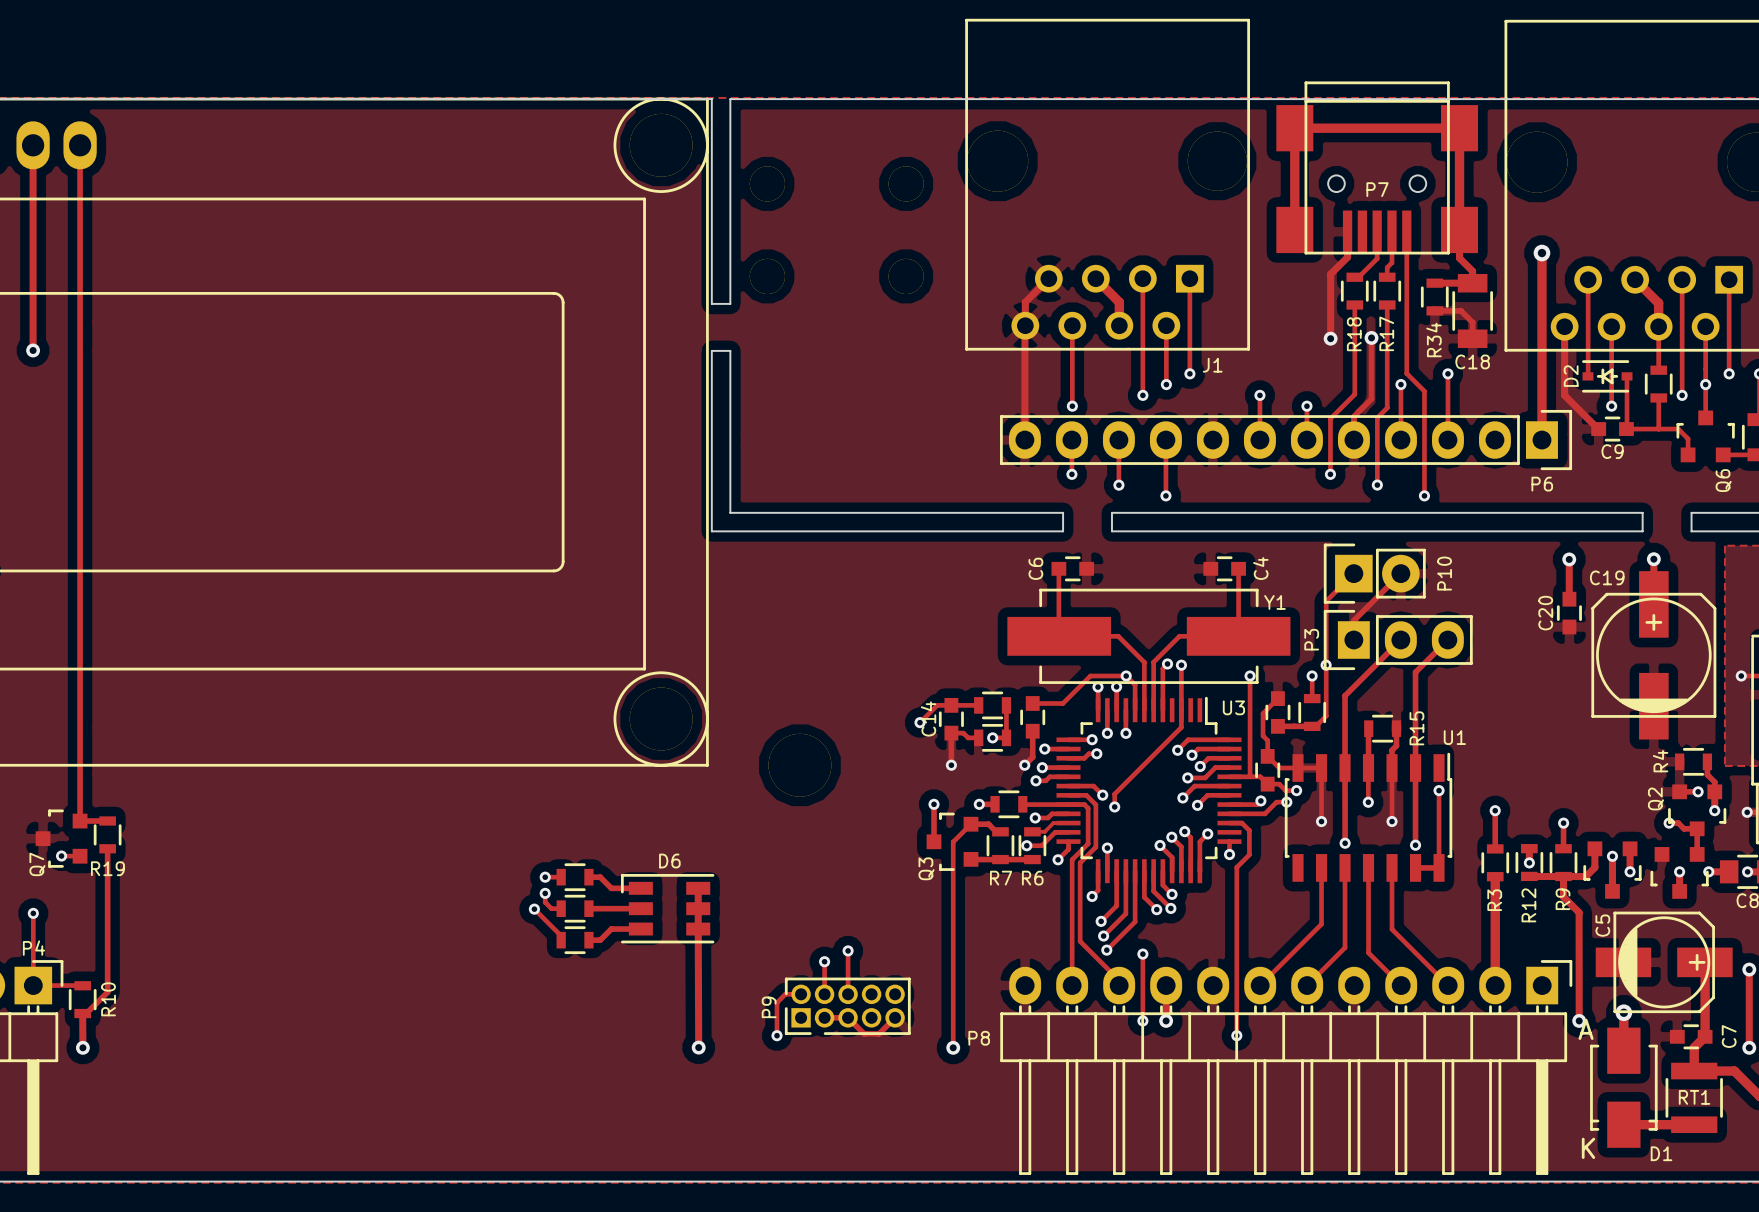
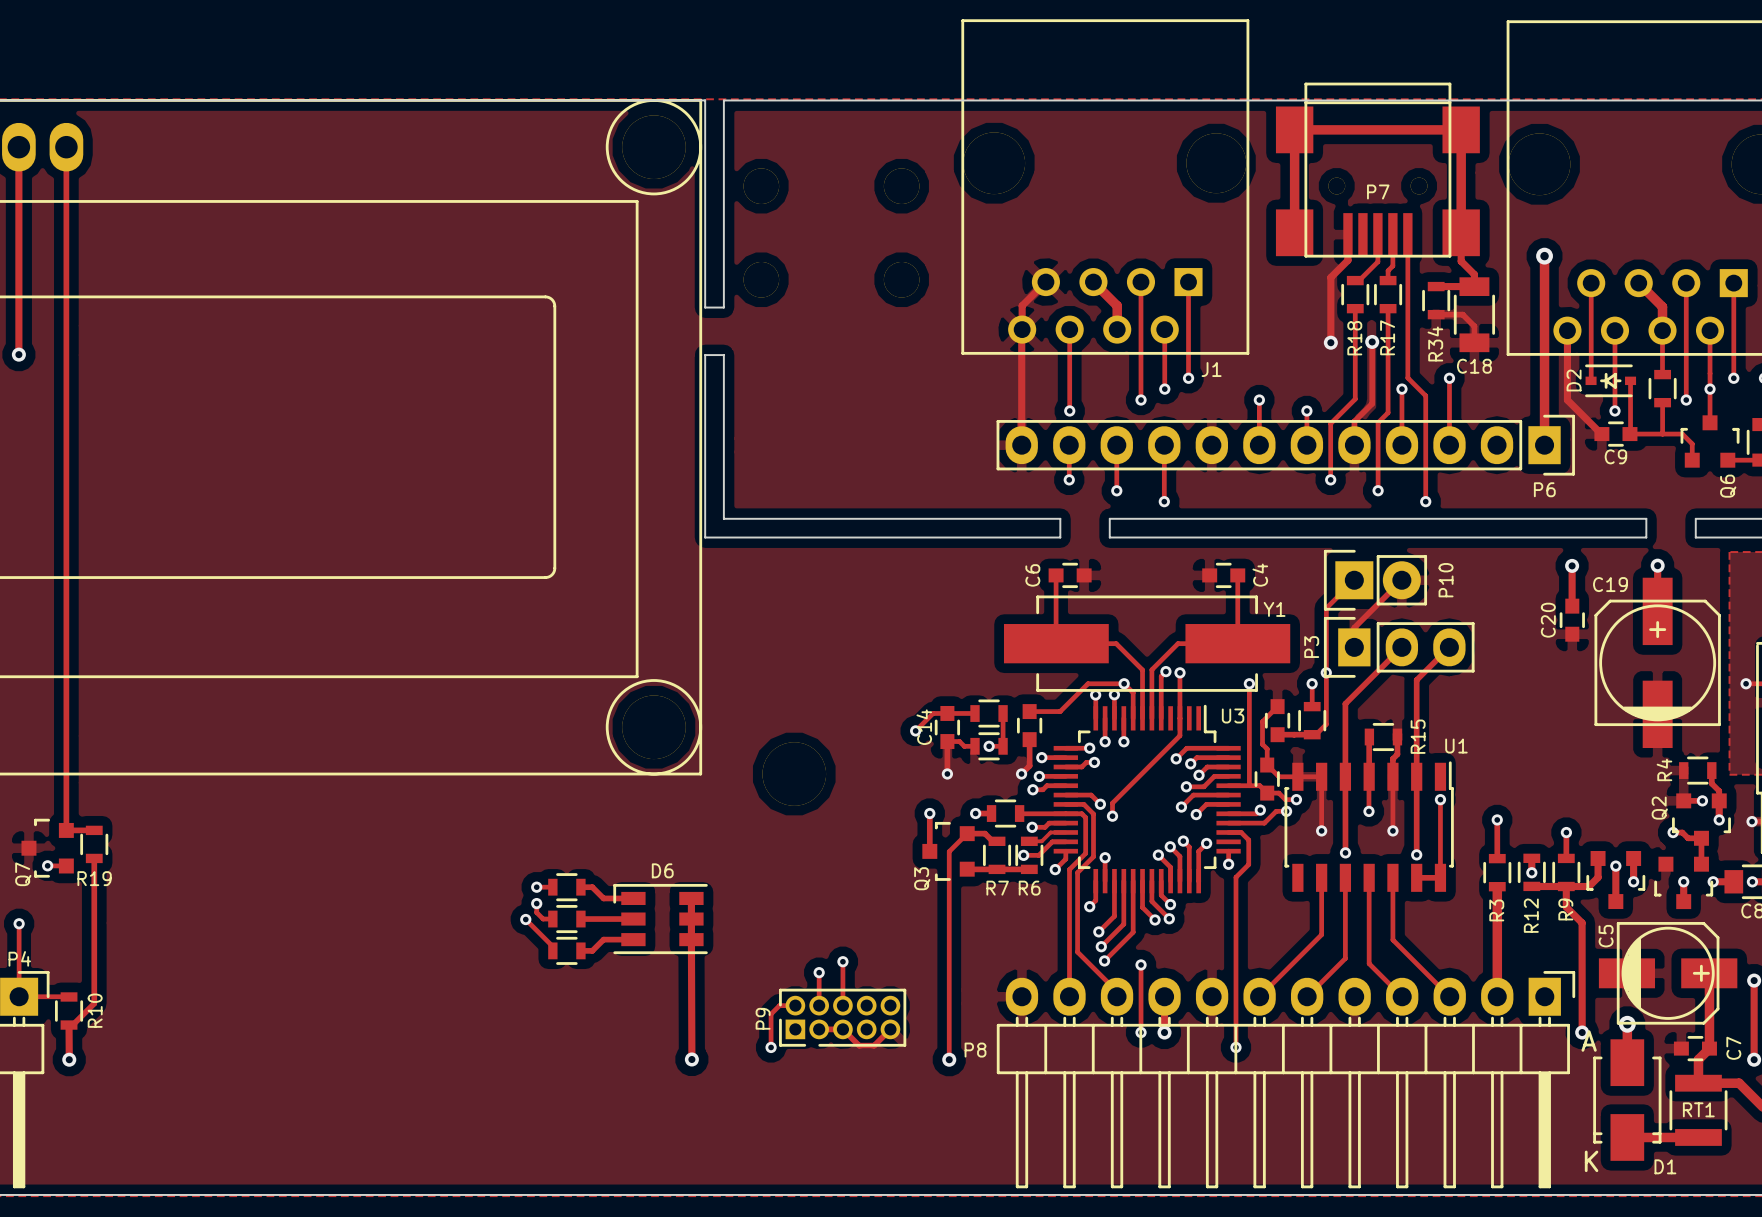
P7 footprint: [1276, 81, 1479, 255] -> [1275, 82, 1480, 258]

